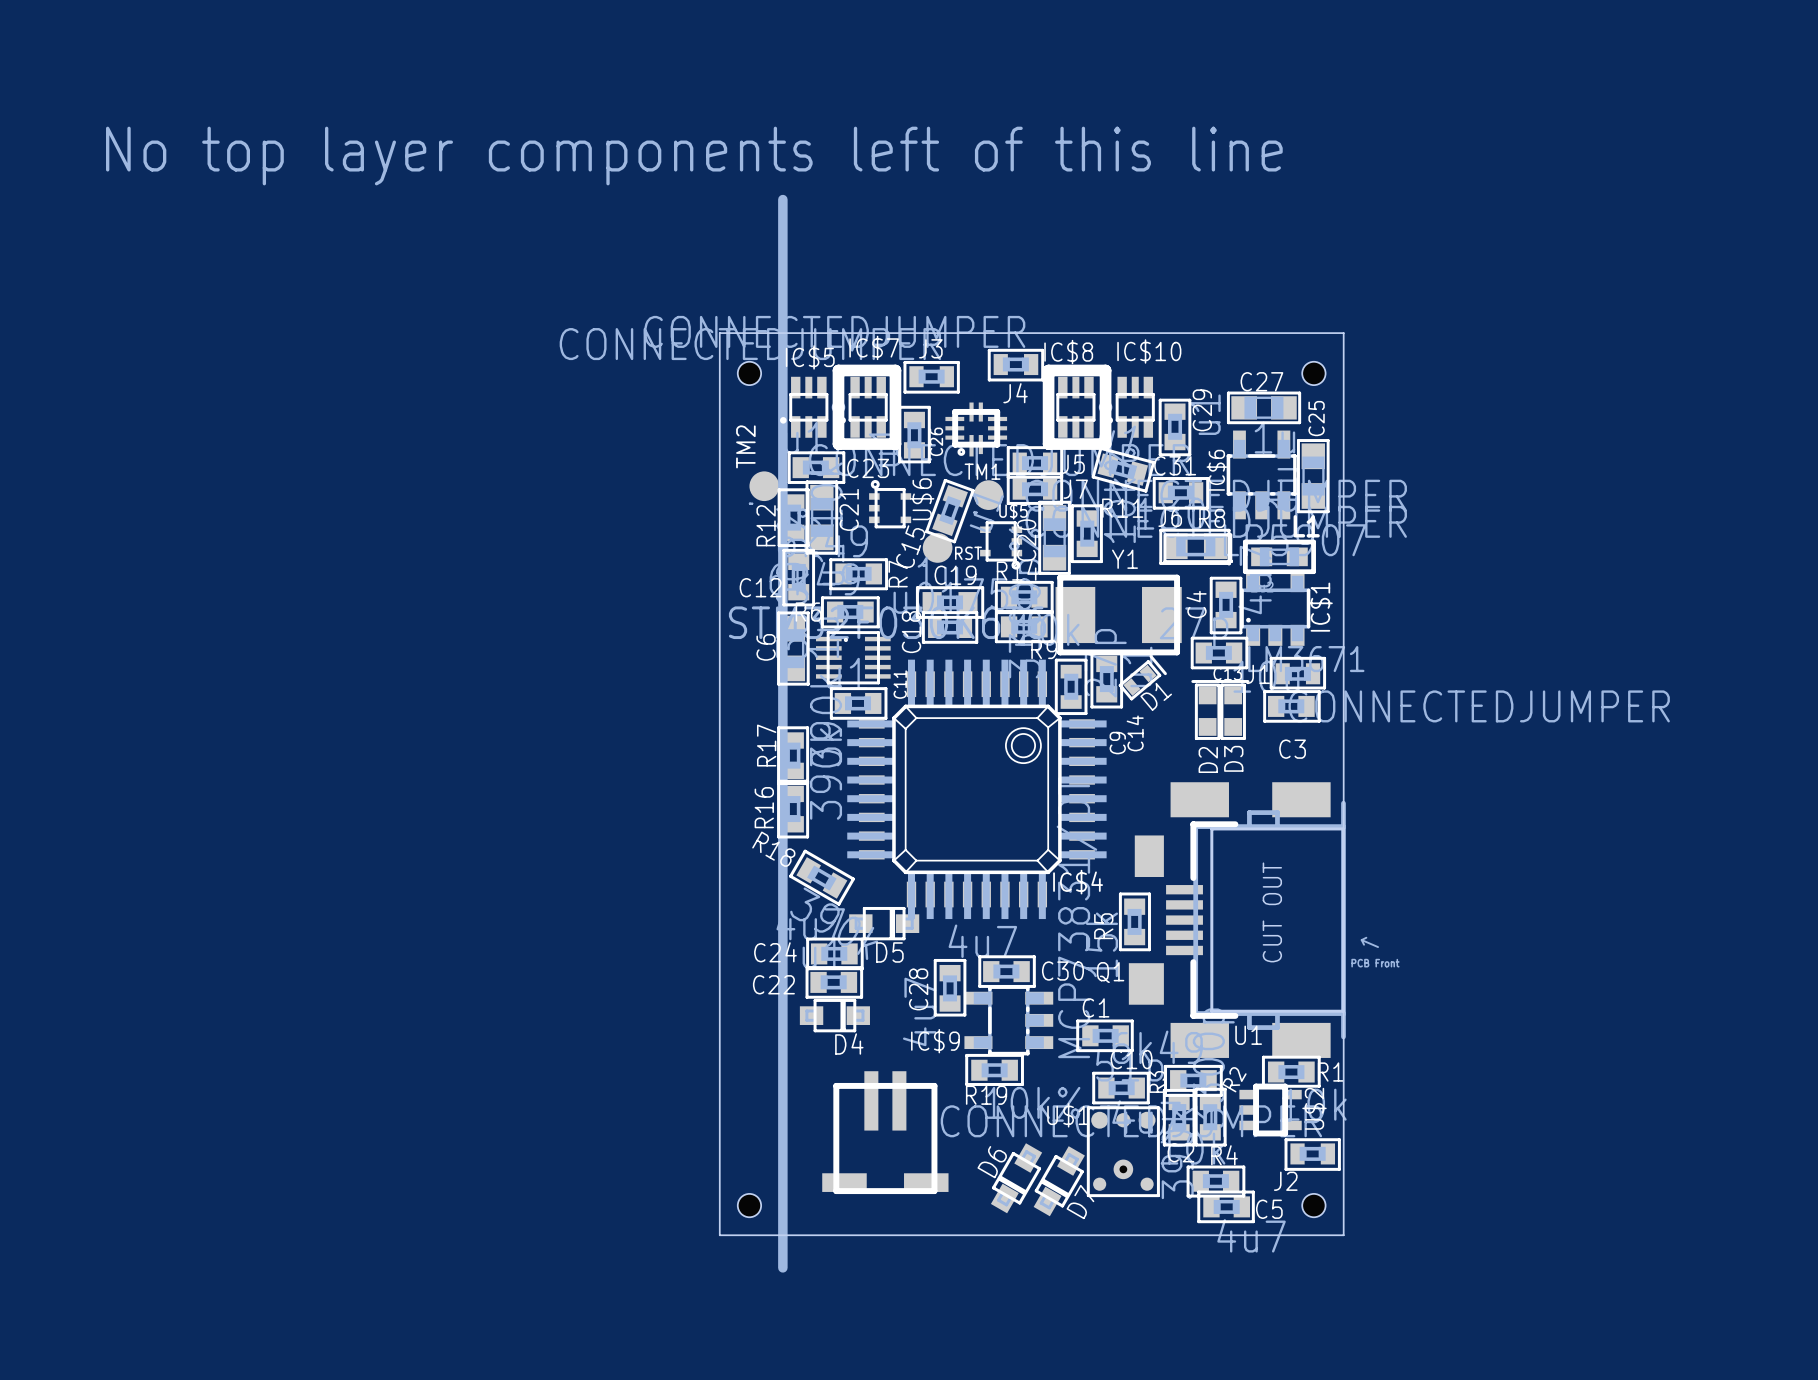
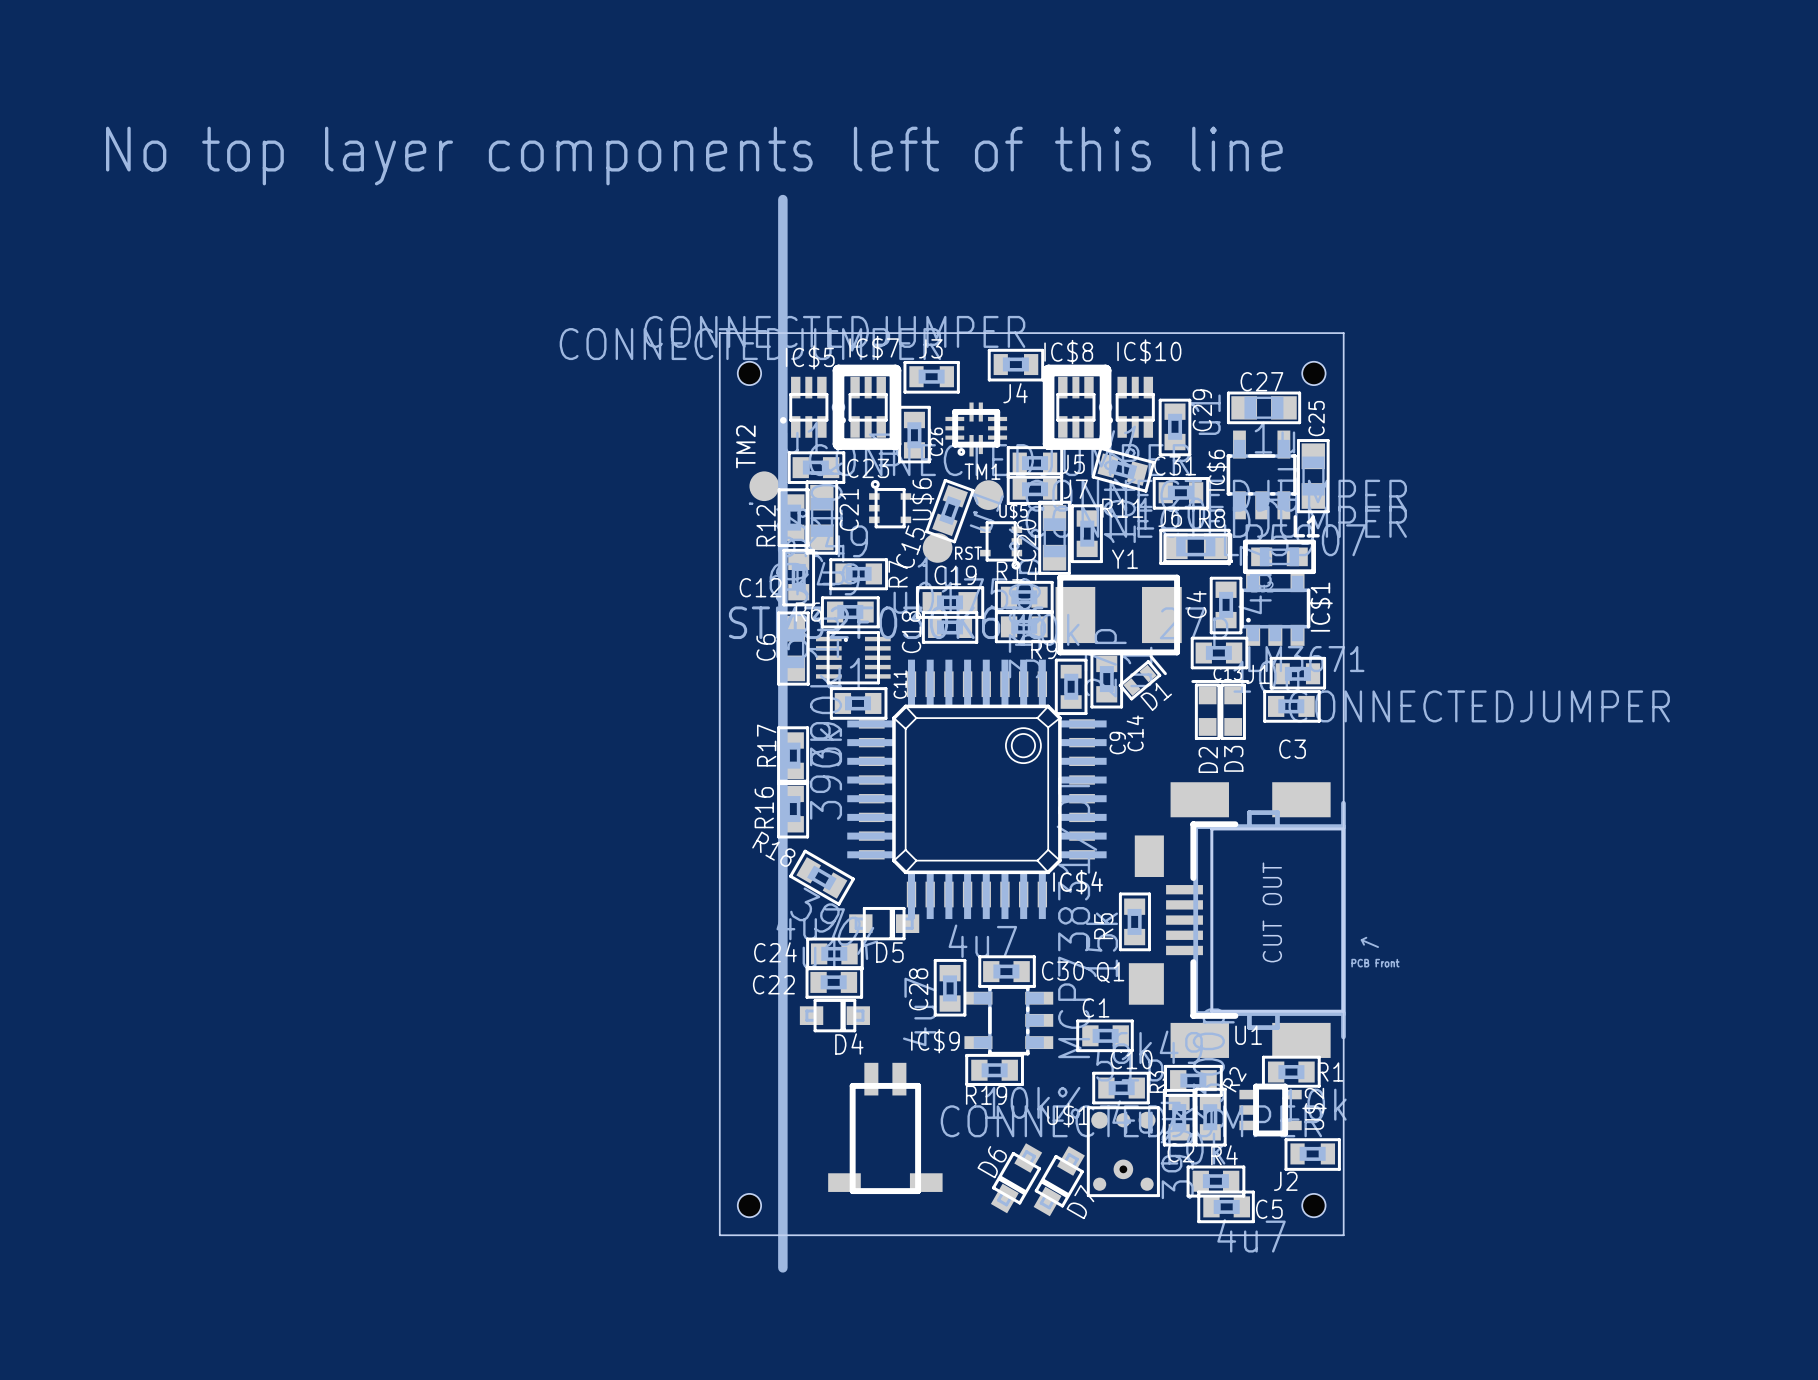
part footprint: [822, 1071, 949, 1195] -> [828, 1062, 943, 1195]

